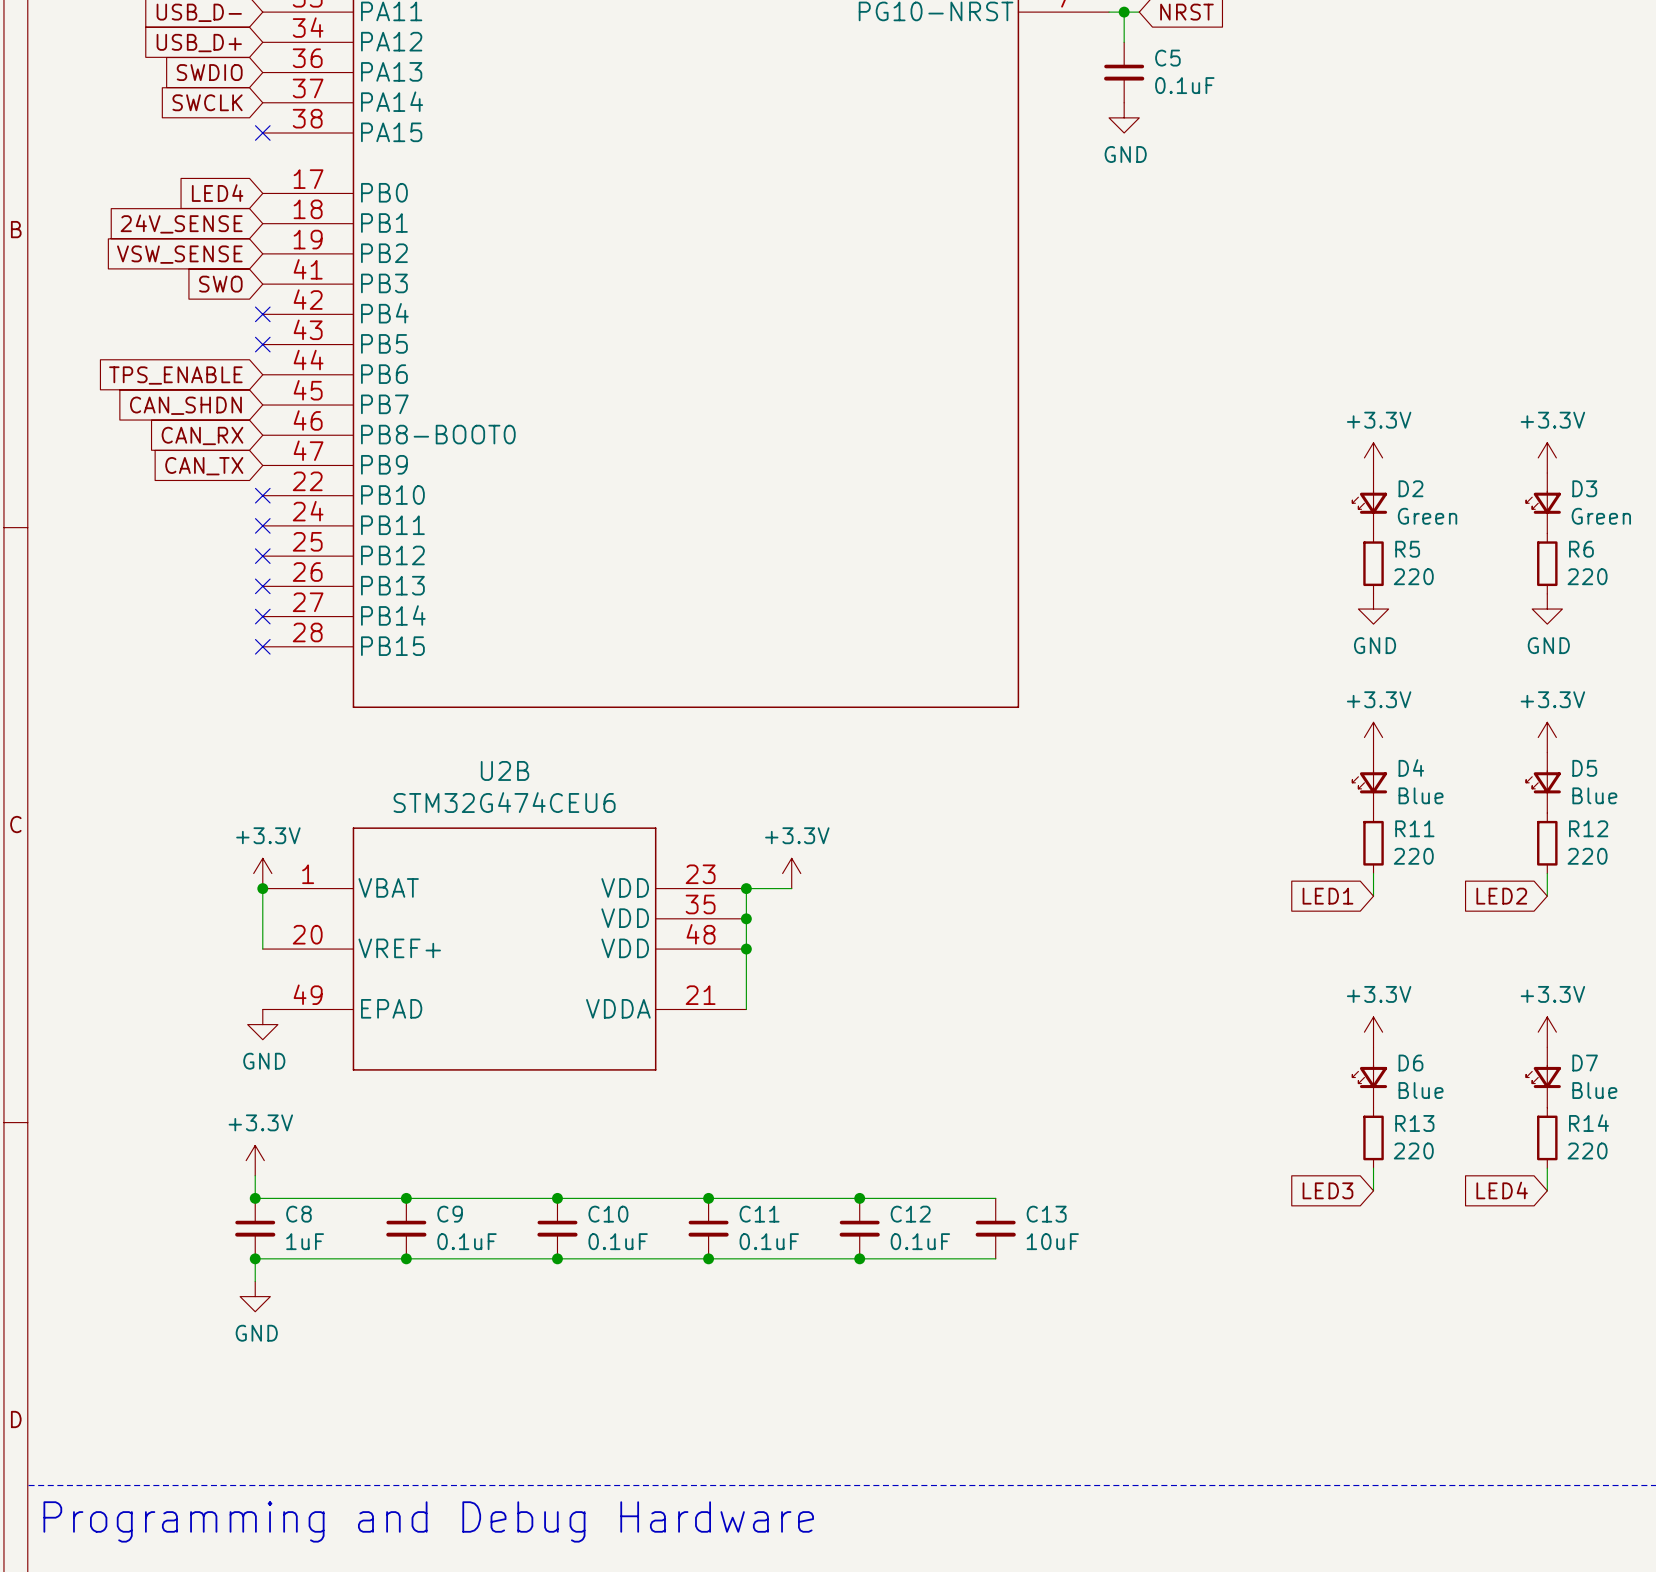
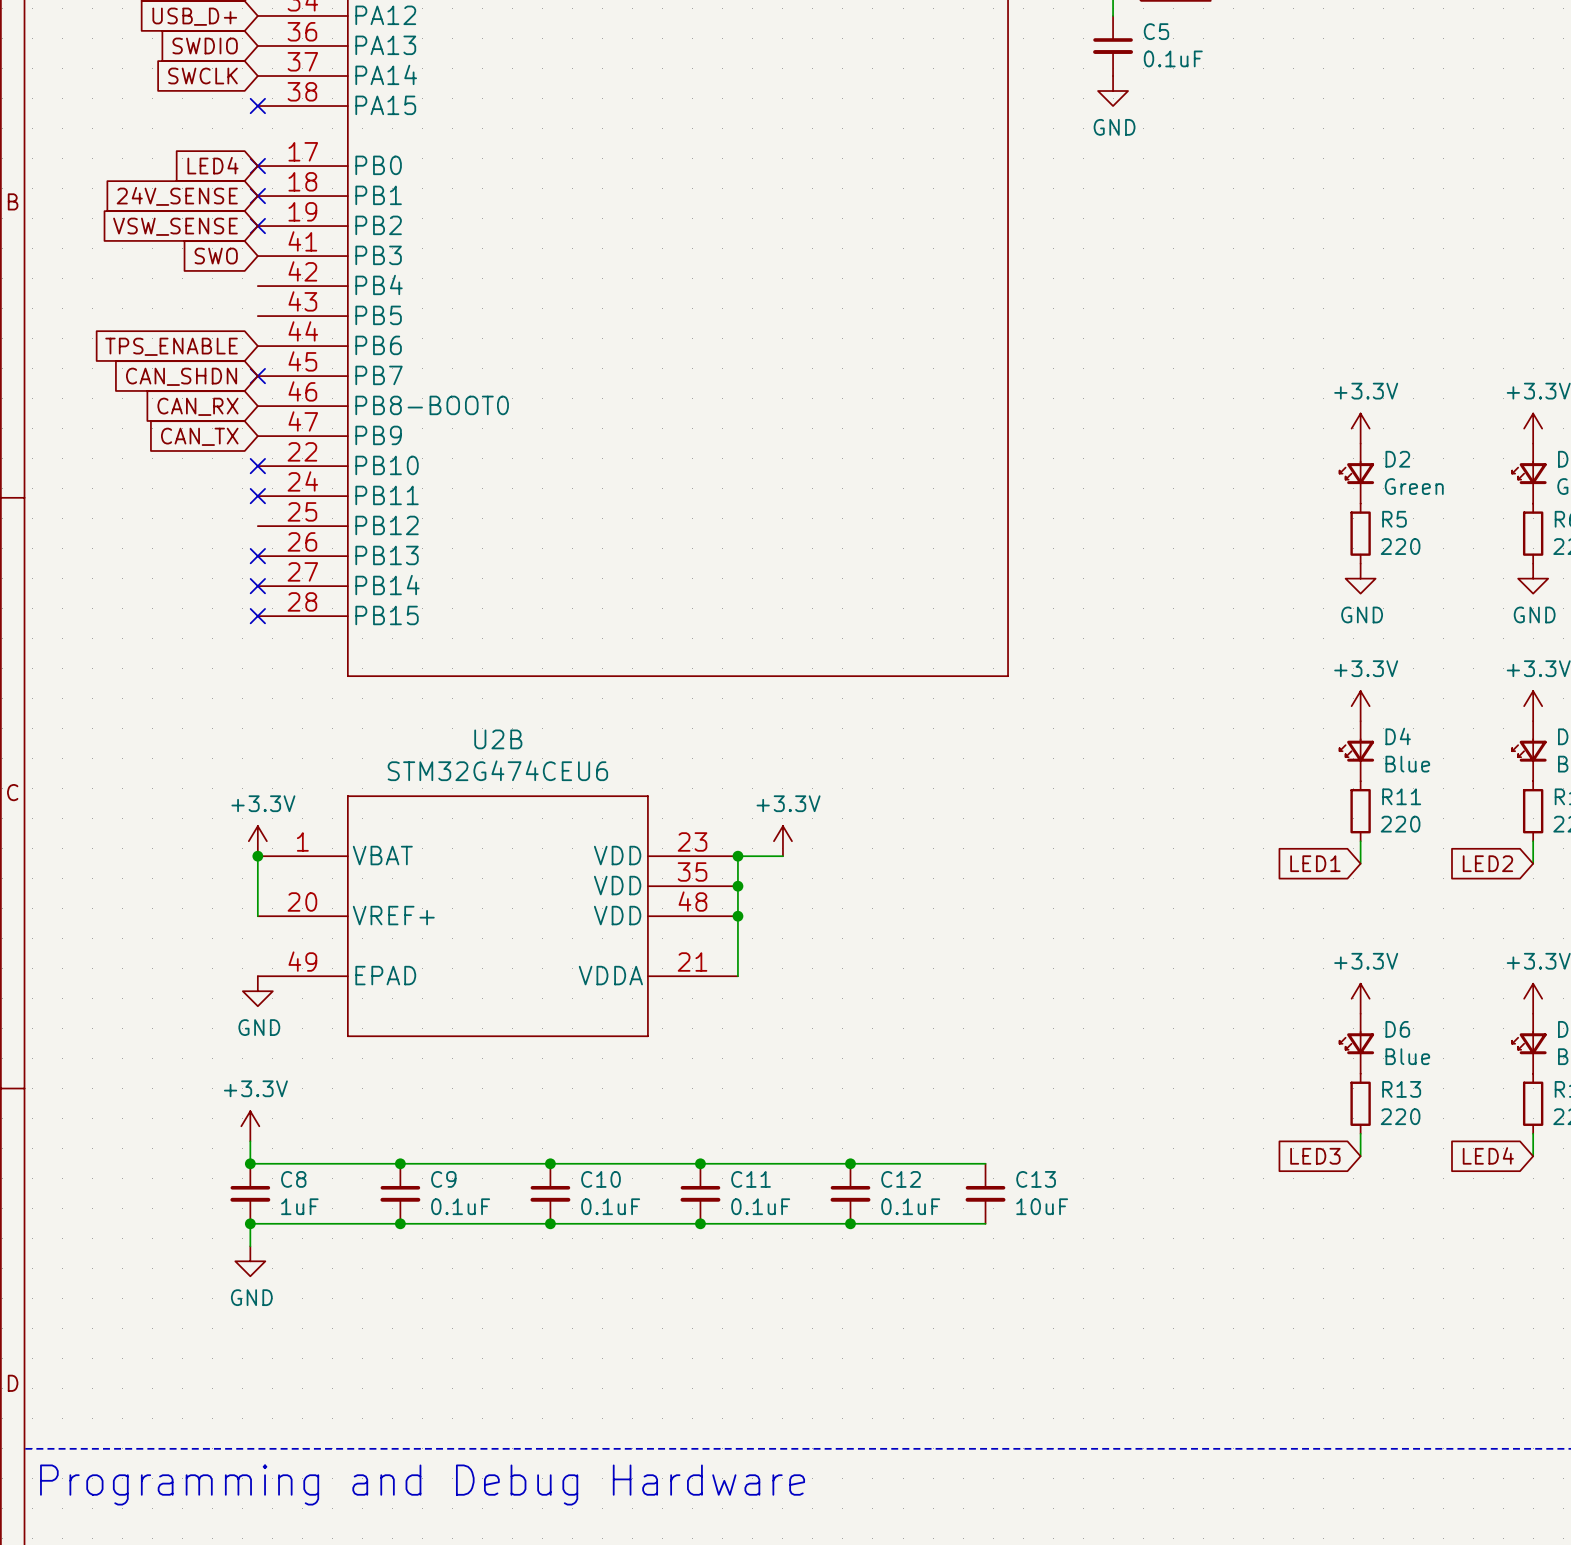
no-connect mark: none -> (257, 166)
no-connect mark: none -> (257, 196)
no-connect mark: none -> (257, 226)
no-connect mark: (262, 314) -> none
no-connect mark: (262, 344) -> none
no-connect mark: none -> (257, 376)
no-connect mark: (262, 556) -> none

